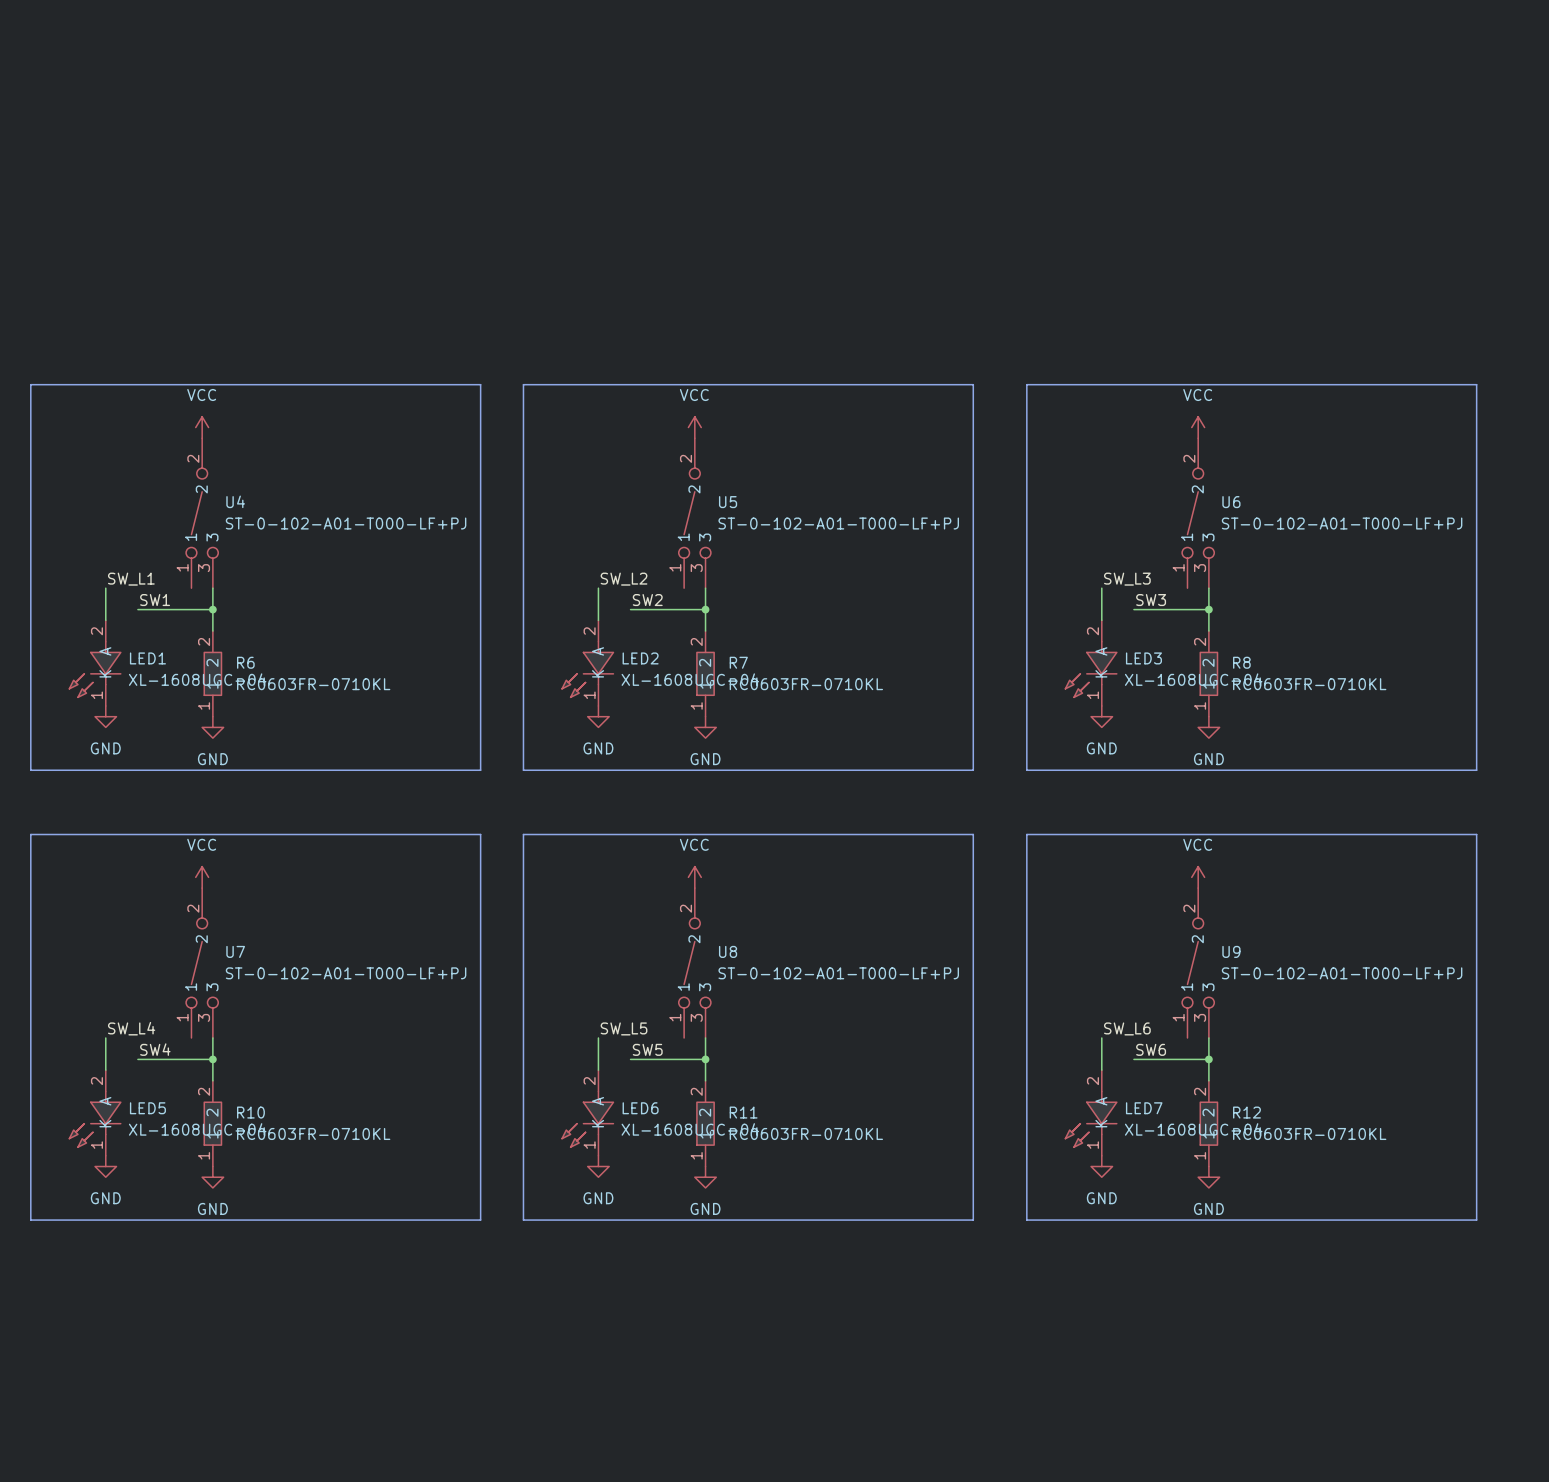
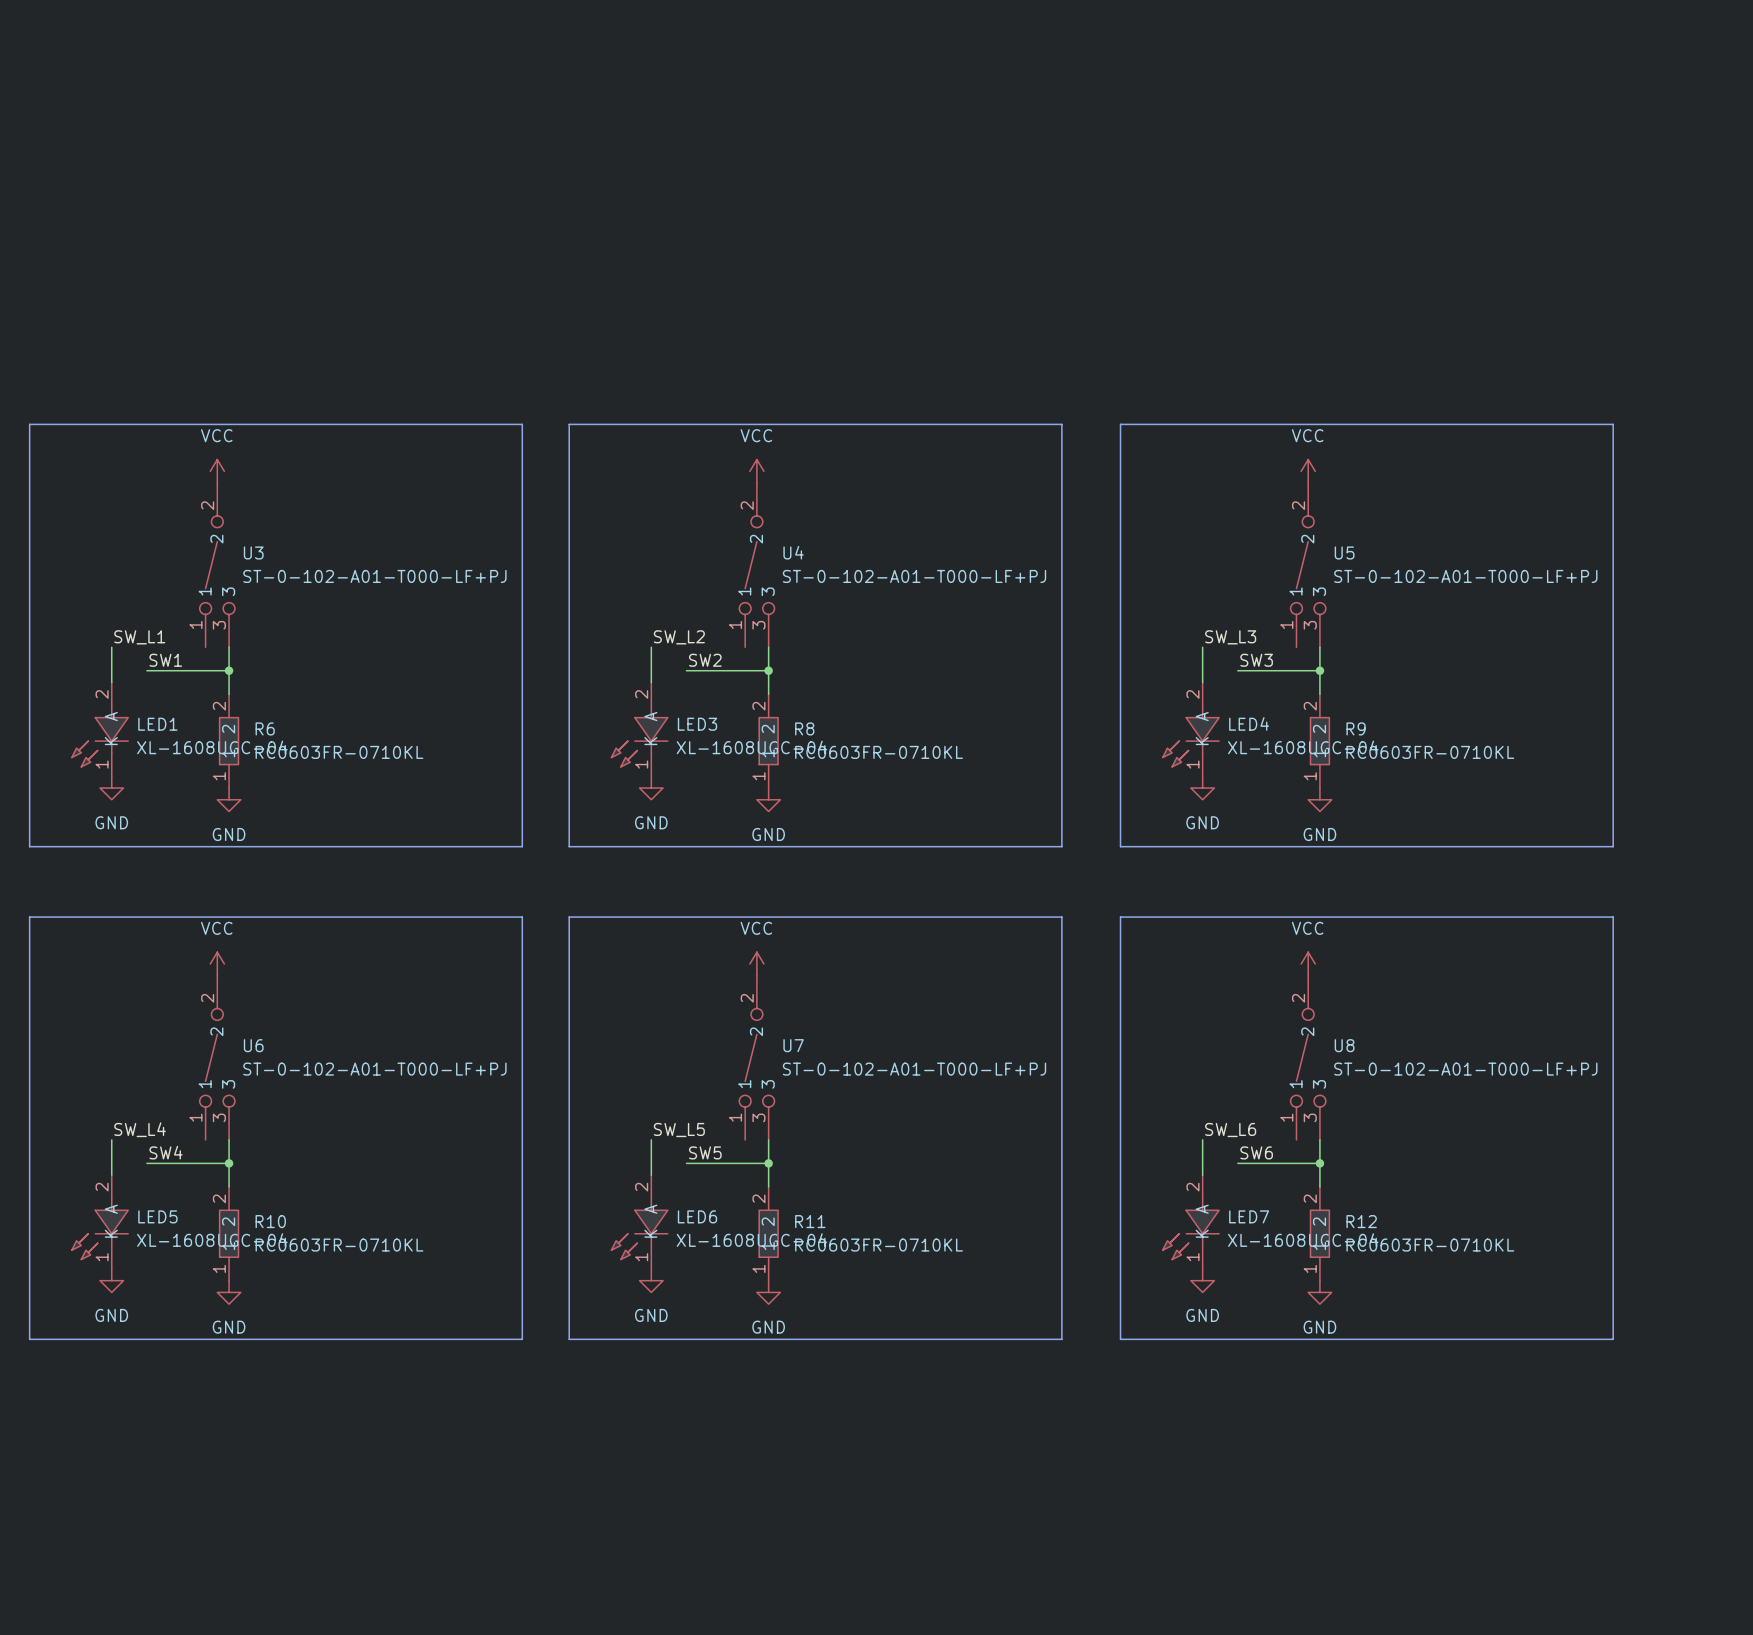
U4 name: U4 (235, 501) -> U3 (253, 552)
U5 name: U5 (728, 502) -> U4 (793, 552)
U6 name: U6 (1231, 502) -> U5 (1344, 552)
LED2 name: LED2 (640, 658) -> LED3 (697, 724)
LED3 name: LED3 (1143, 658) -> LED4 (1249, 723)
R7 name: R7 (738, 662) -> R8 (804, 728)
R8 name: R8 (1241, 662) -> R9 (1356, 728)
U7 name: U7 (235, 951) -> U6 (253, 1045)
U8 name: U8 (728, 951) -> U7 (793, 1045)
U9 name: U9 (1231, 951) -> U8 (1344, 1045)

